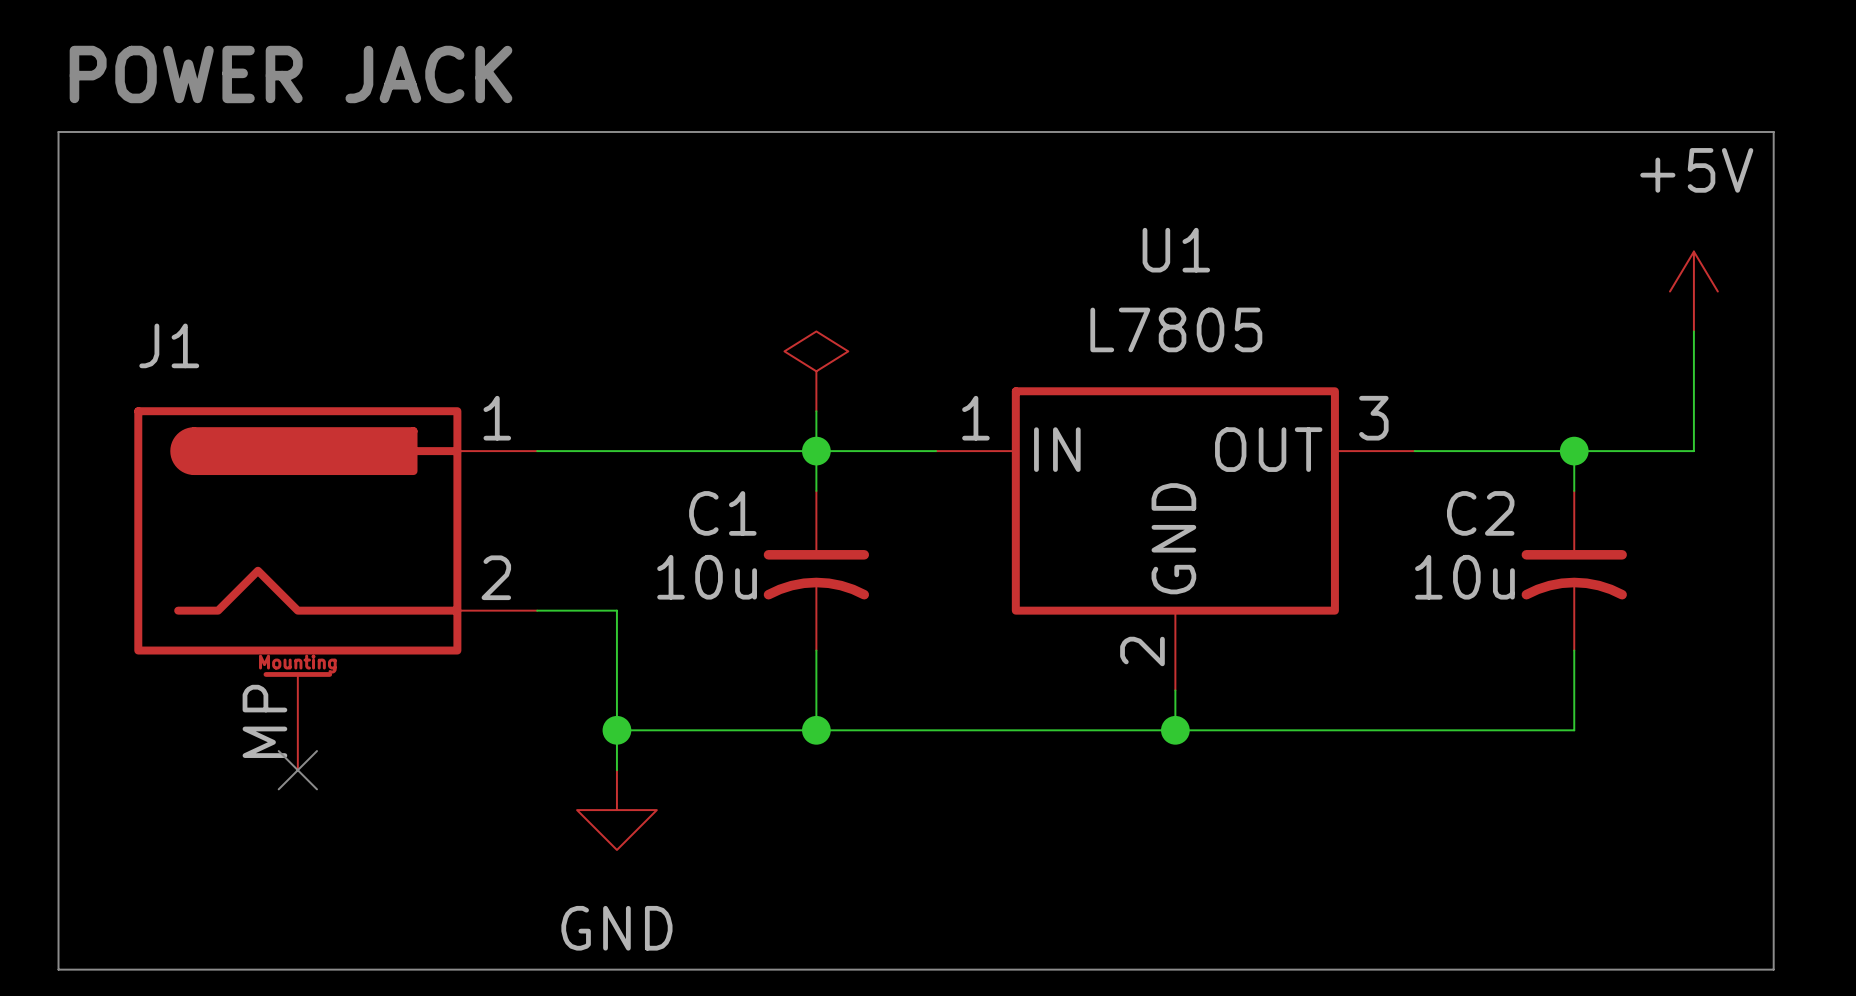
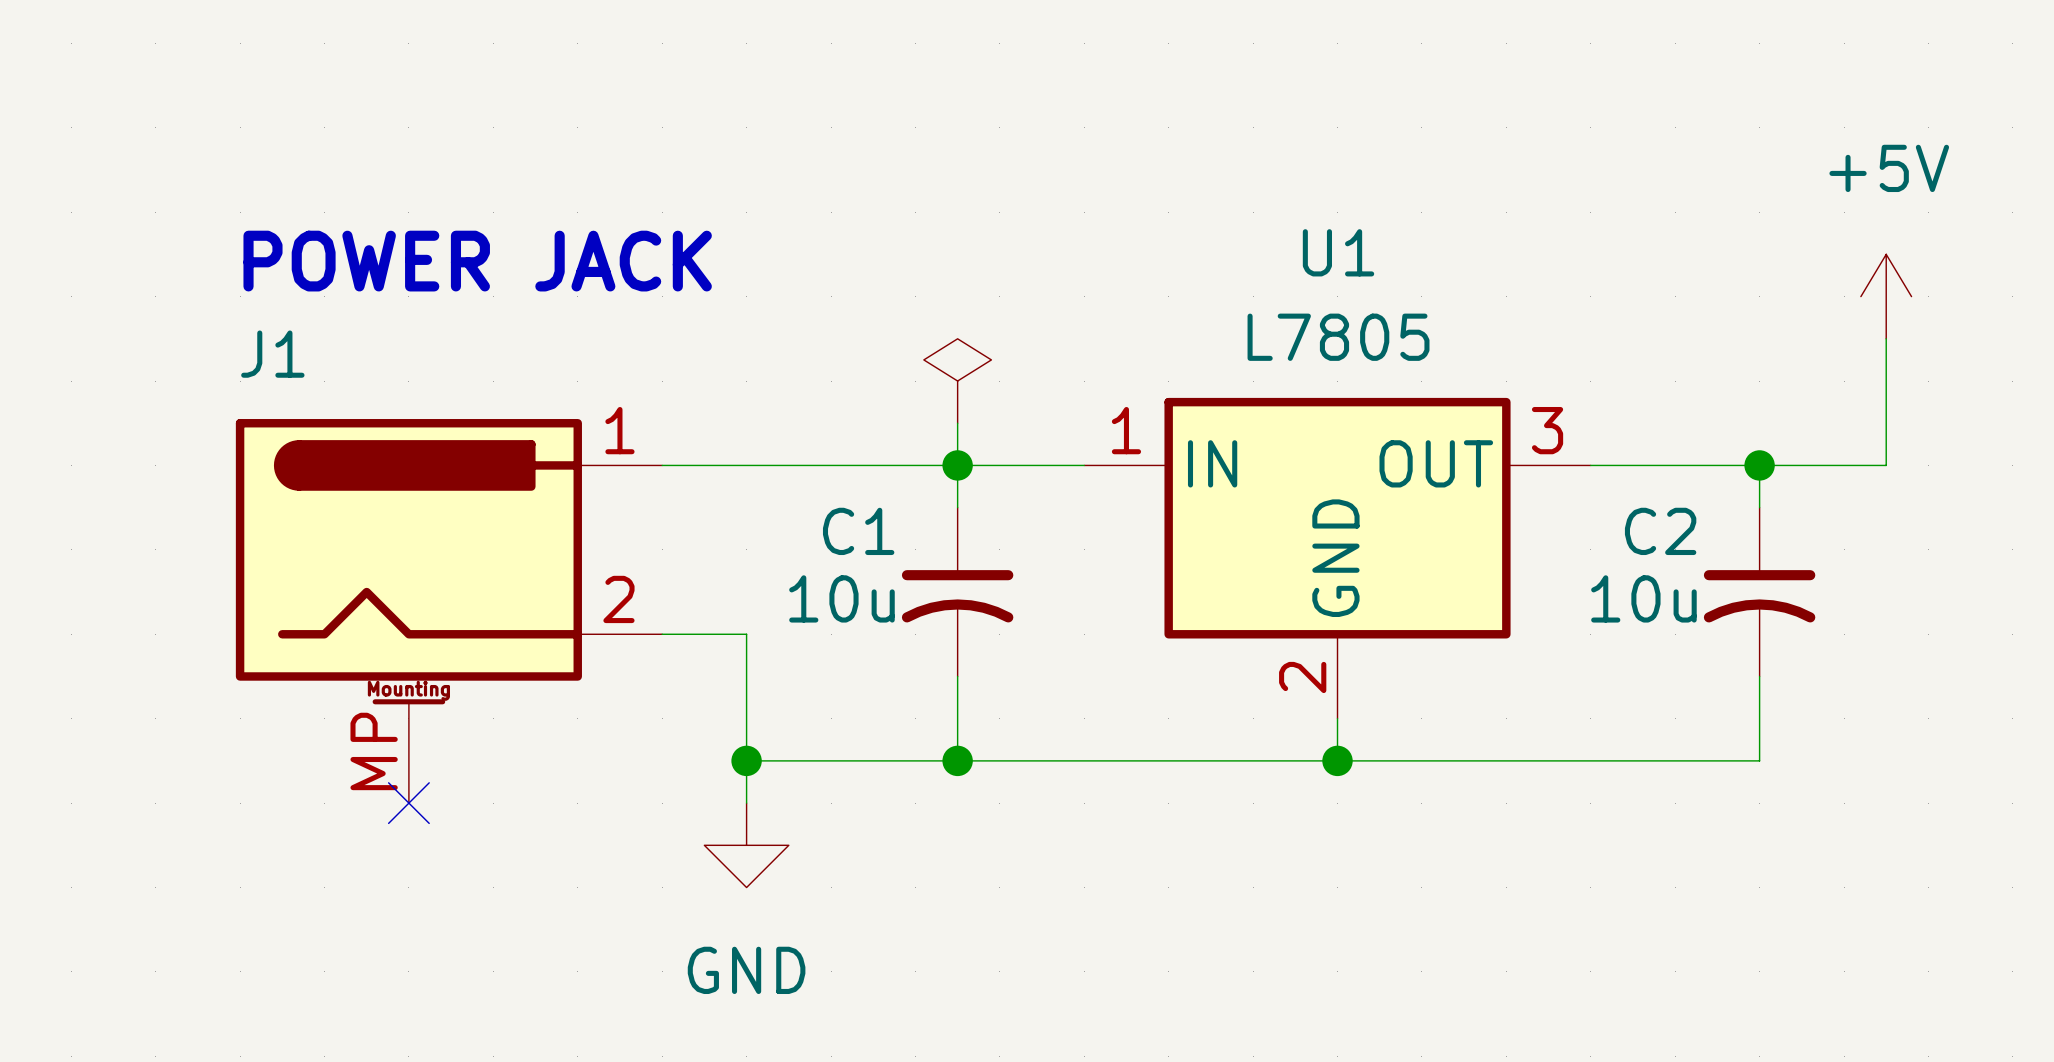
text position: POWER JACK (291, 74) -> POWER JACK (477, 261)
line: (58, 131) (1773, 131) (1773, 969) (58, 969) (58, 131) -> none

